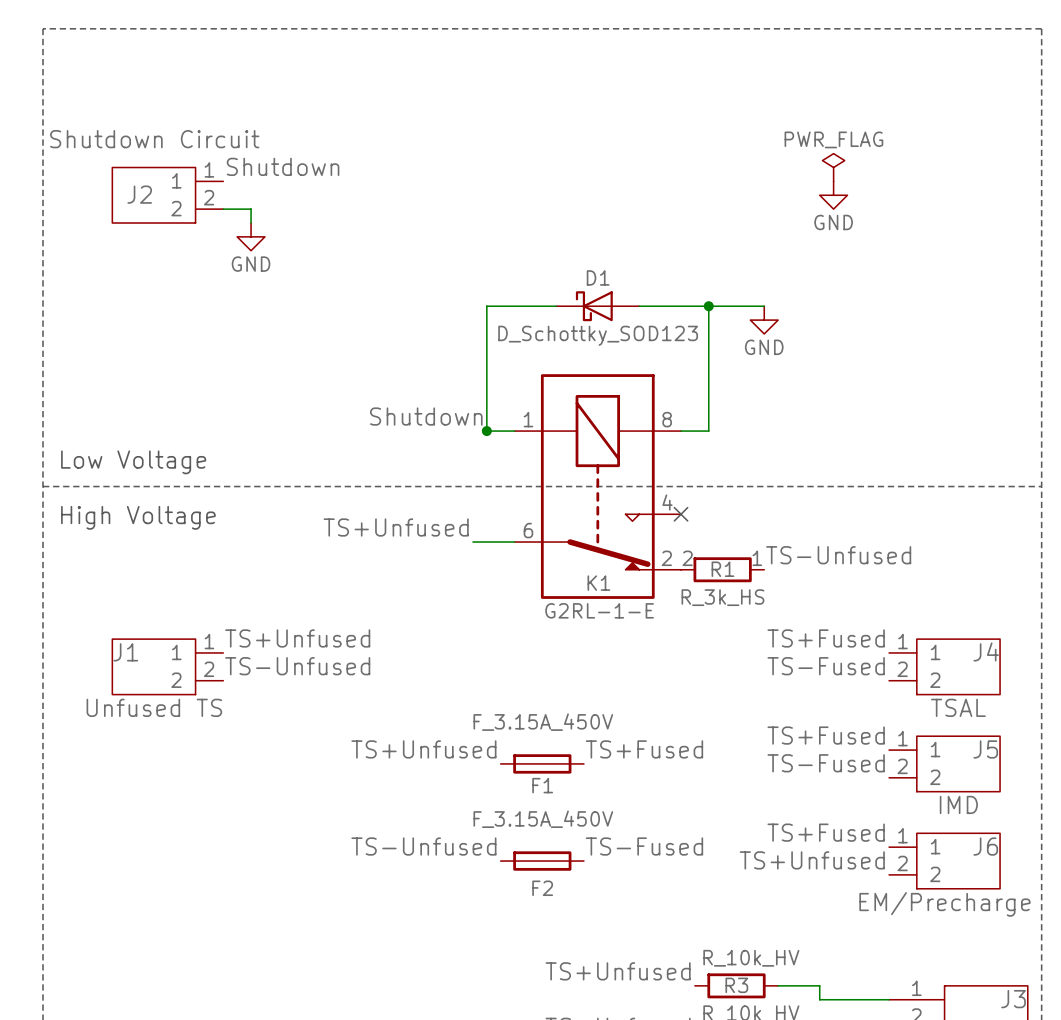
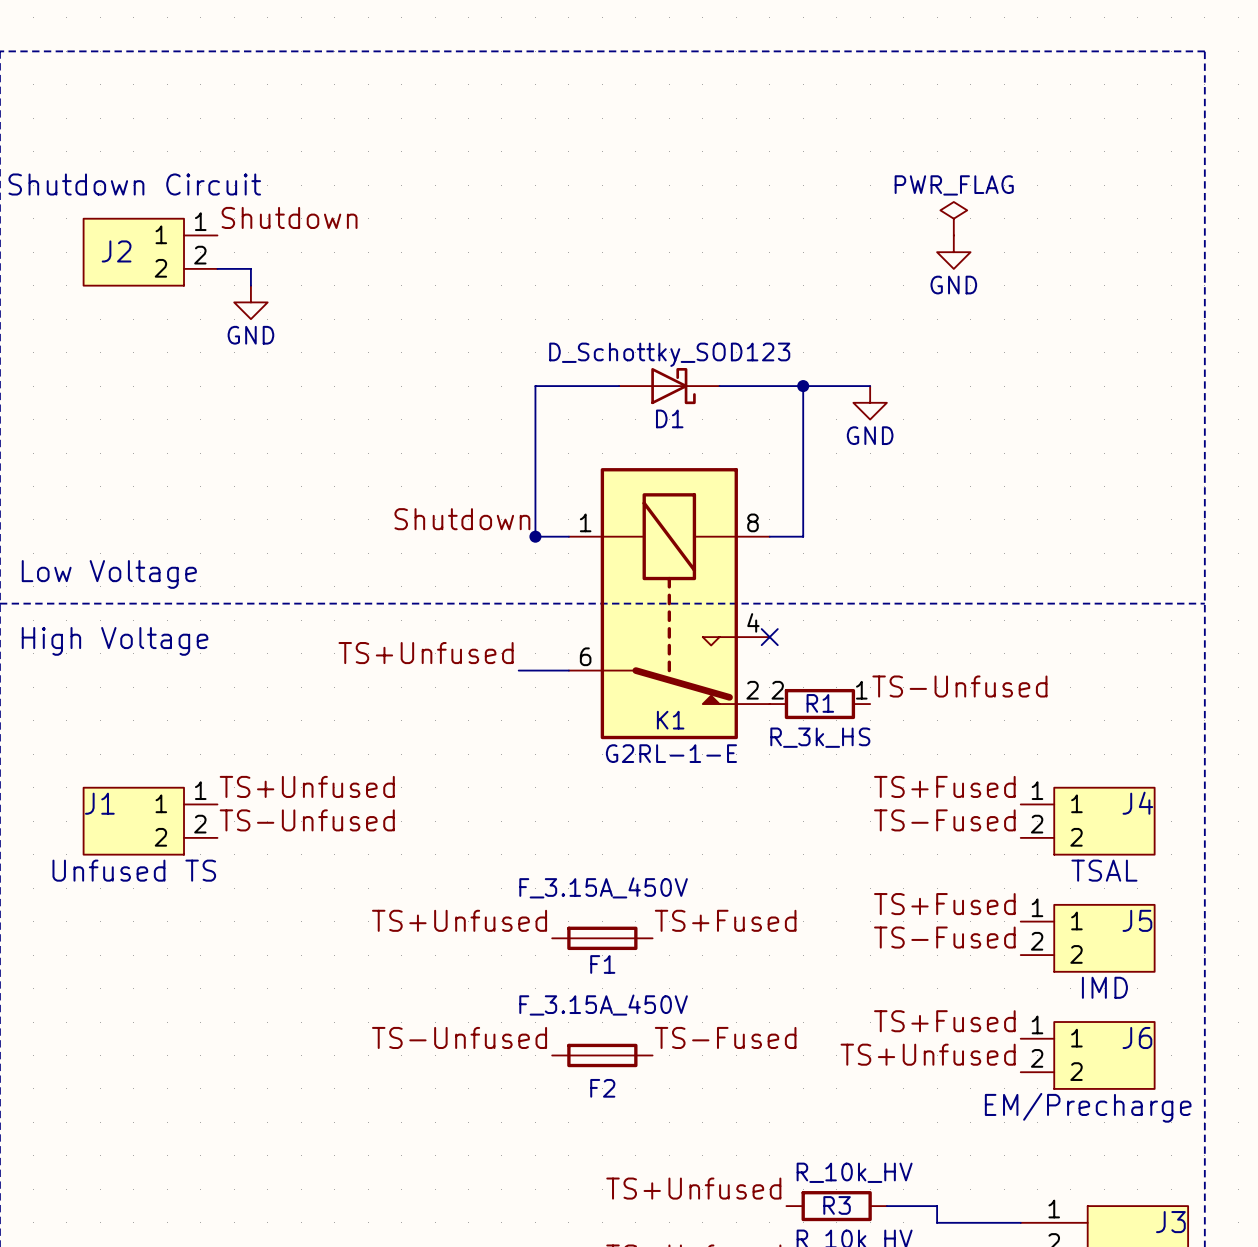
D1 rotation: 0° (594, 306) -> 180° (673, 386)

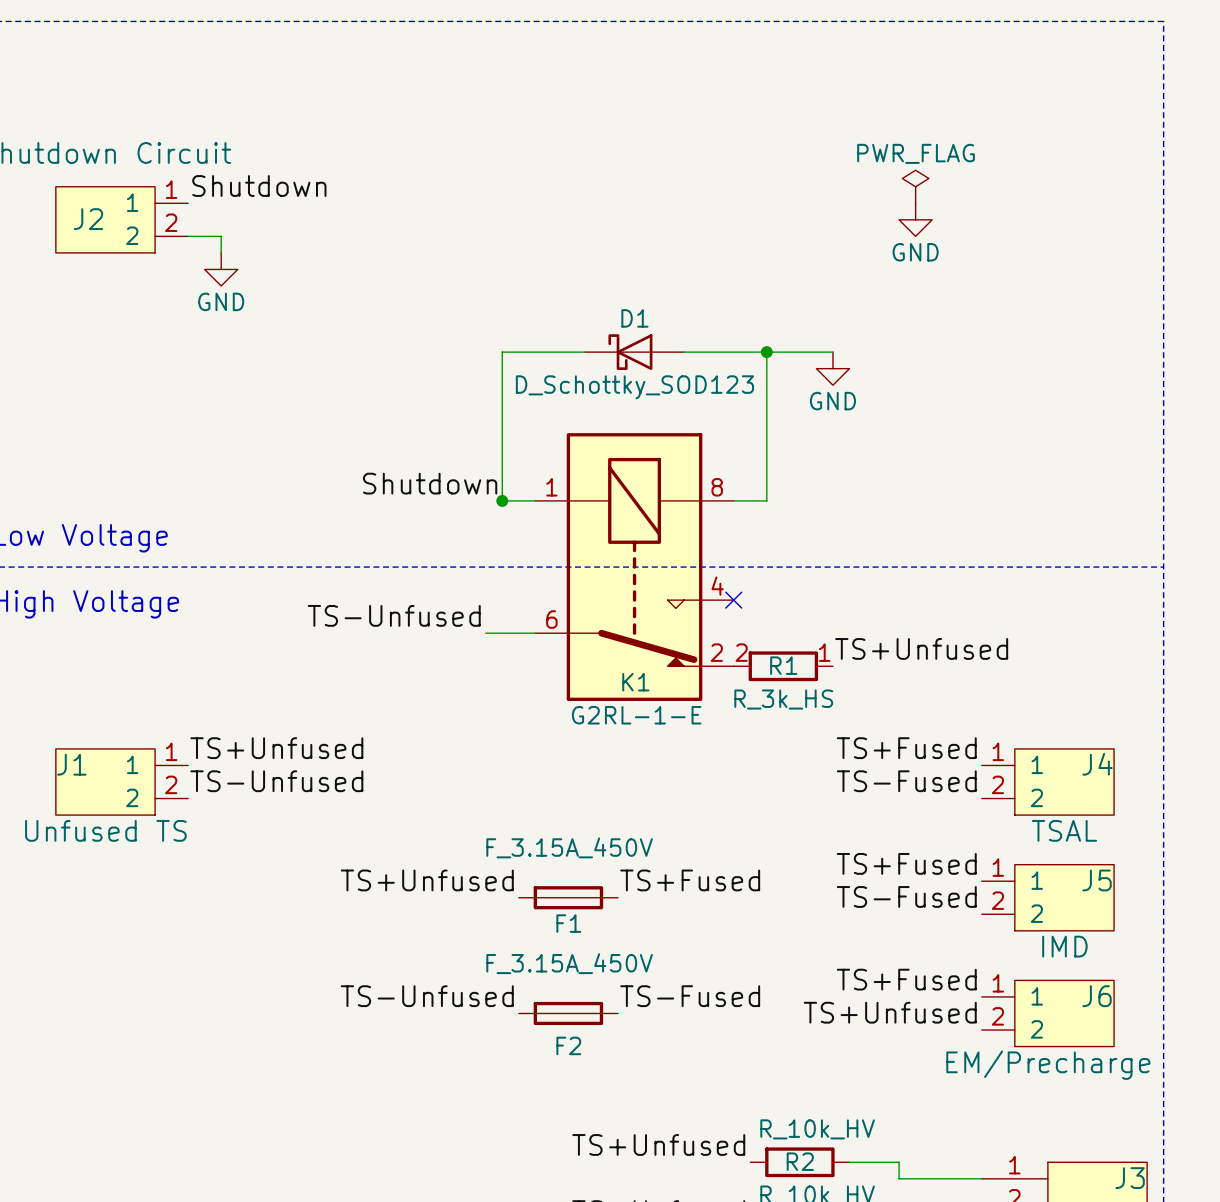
D1 rotation: 0° (673, 386) -> 180° (630, 352)
label: TS+Unfused (426, 653) -> TS-Unfused (394, 615)
label: TS-Unfused (959, 686) -> TS+Unfused (921, 648)
R3 name: R3 (837, 1205) -> R2 (800, 1161)

